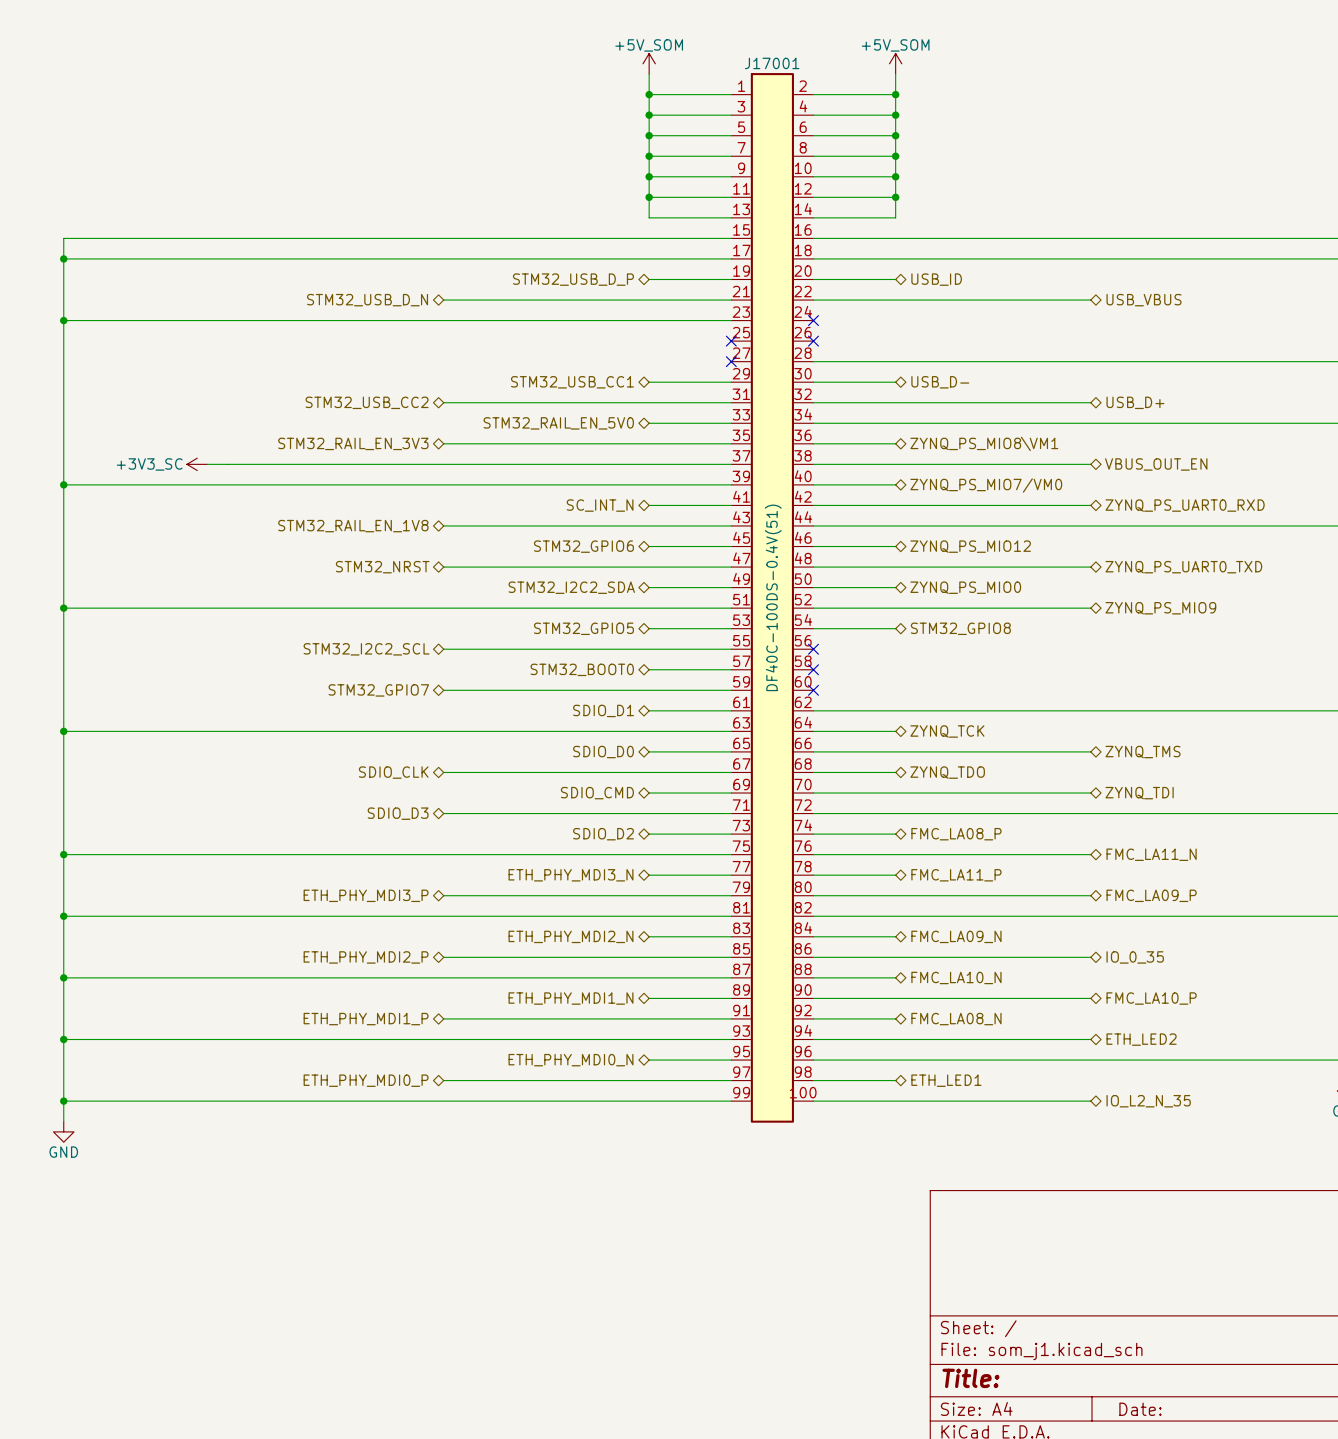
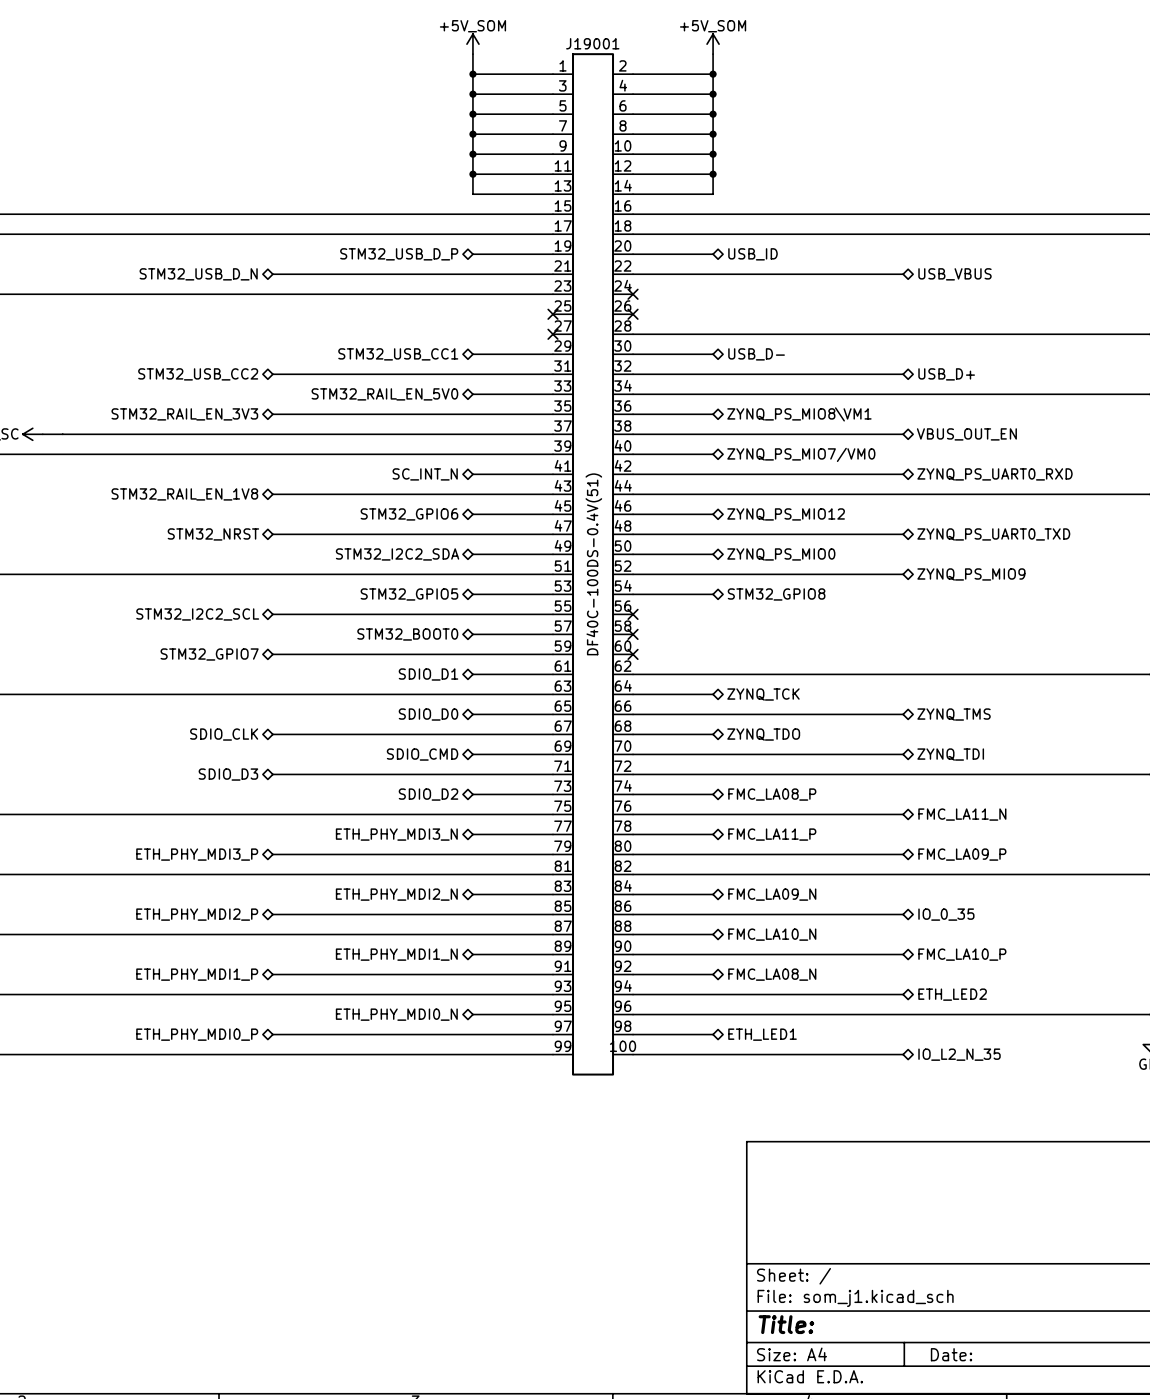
J17001 name: J17001 (772, 63) -> J19001 (592, 43)

